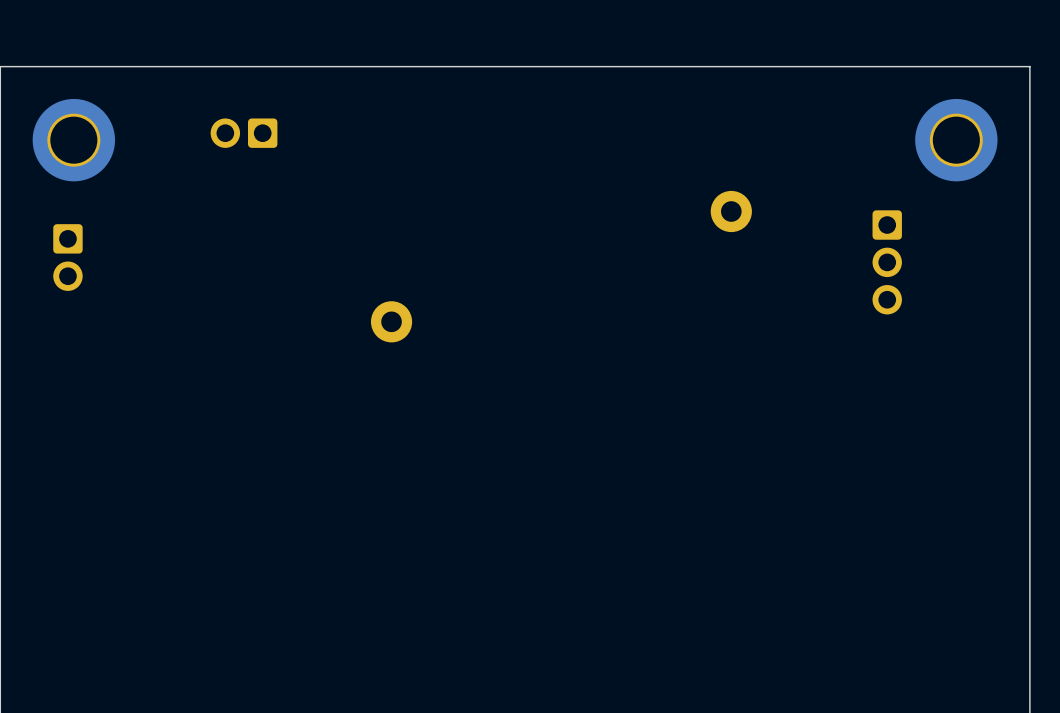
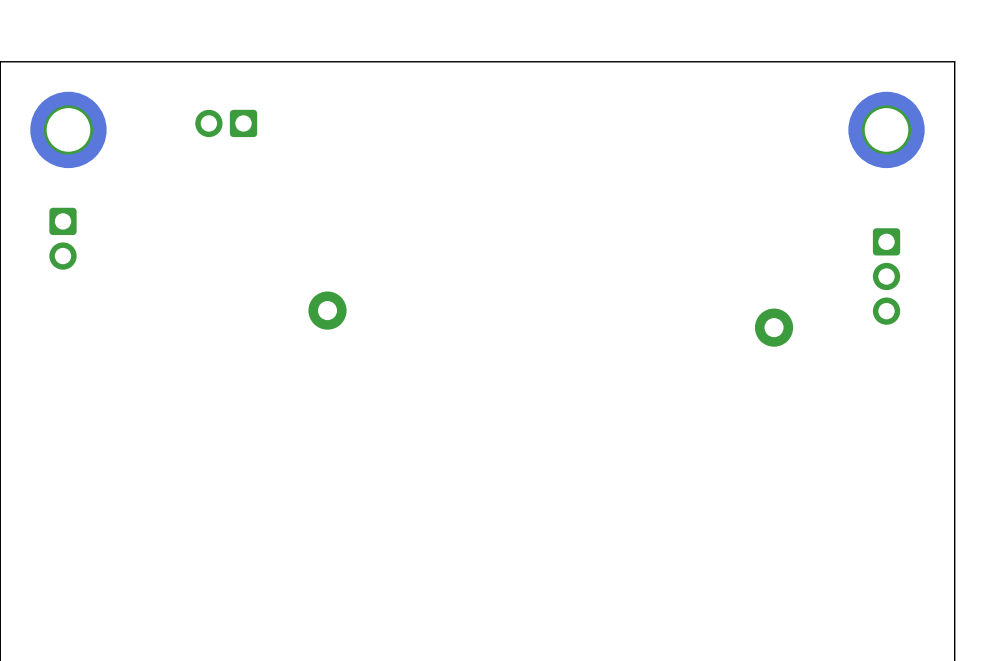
part position: (731, 211) -> (774, 327)
part position: (887, 262) -> (886, 276)
part position: (391, 321) -> (327, 310)

